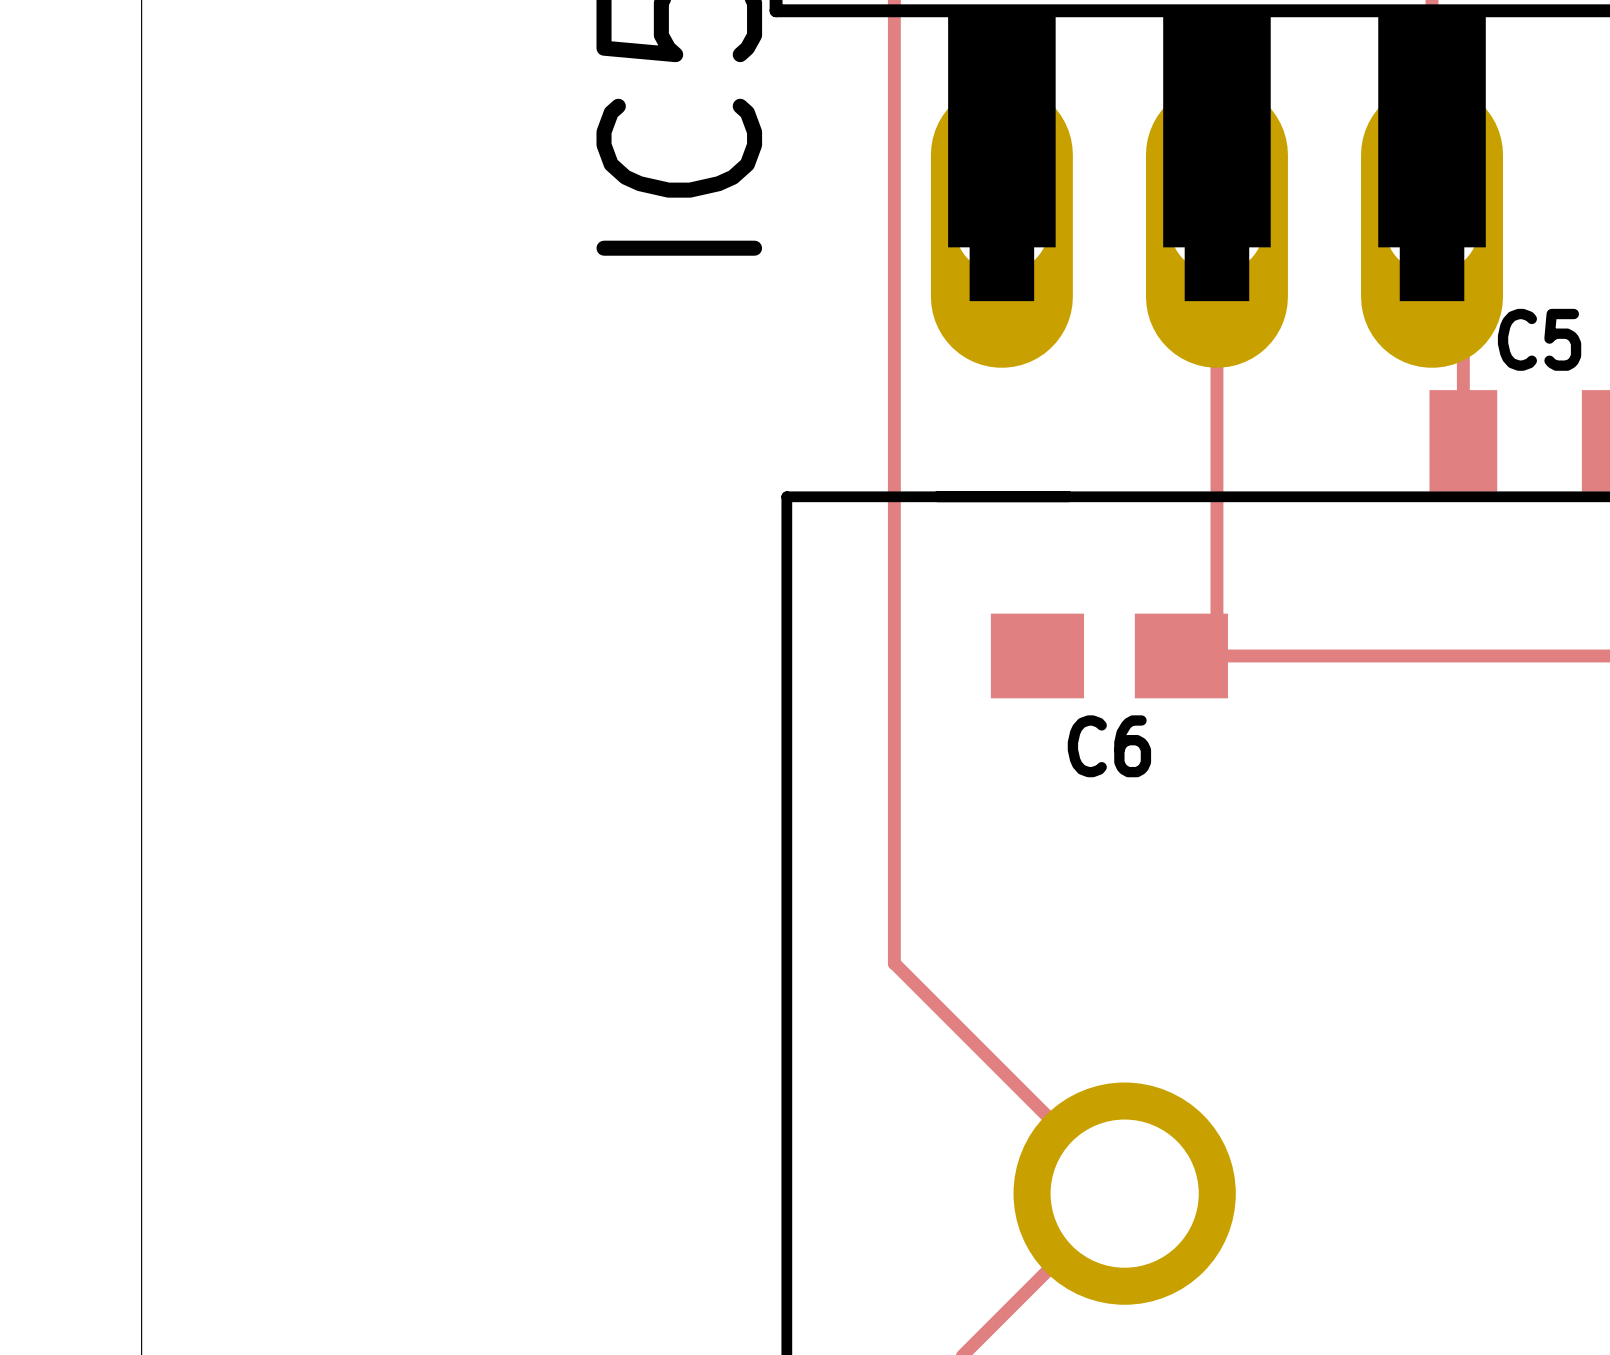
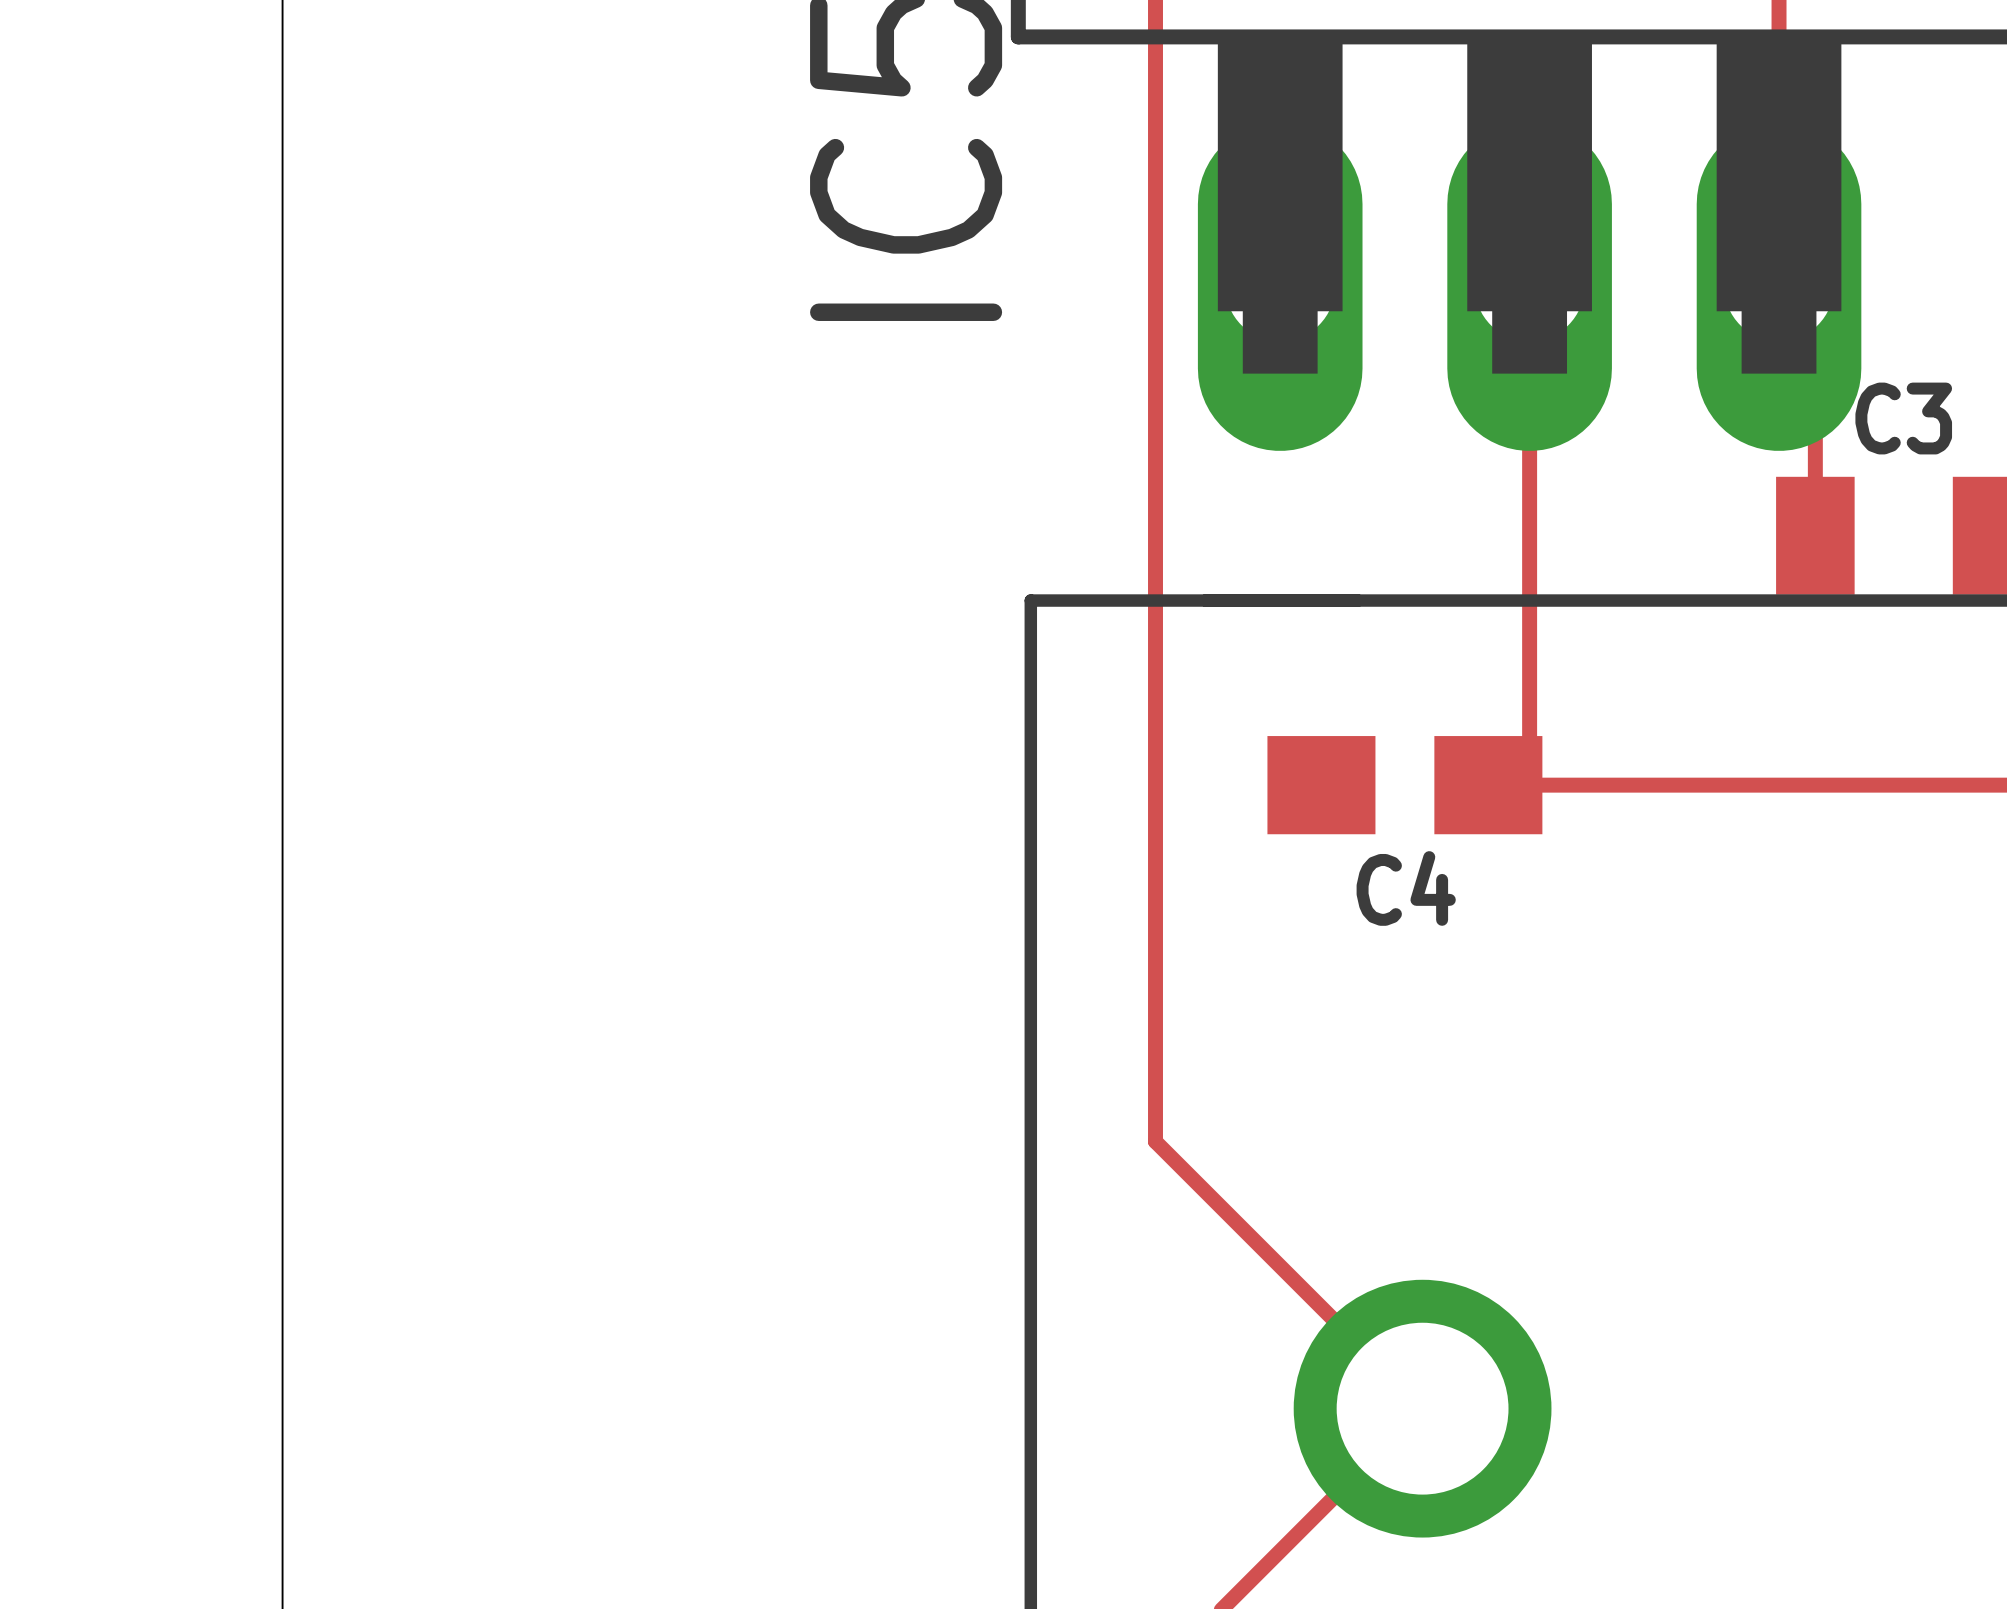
C5 name: C5 (1539, 339) -> C3 (1903, 418)
C6 name: C6 (1109, 746) -> C4 (1406, 888)

